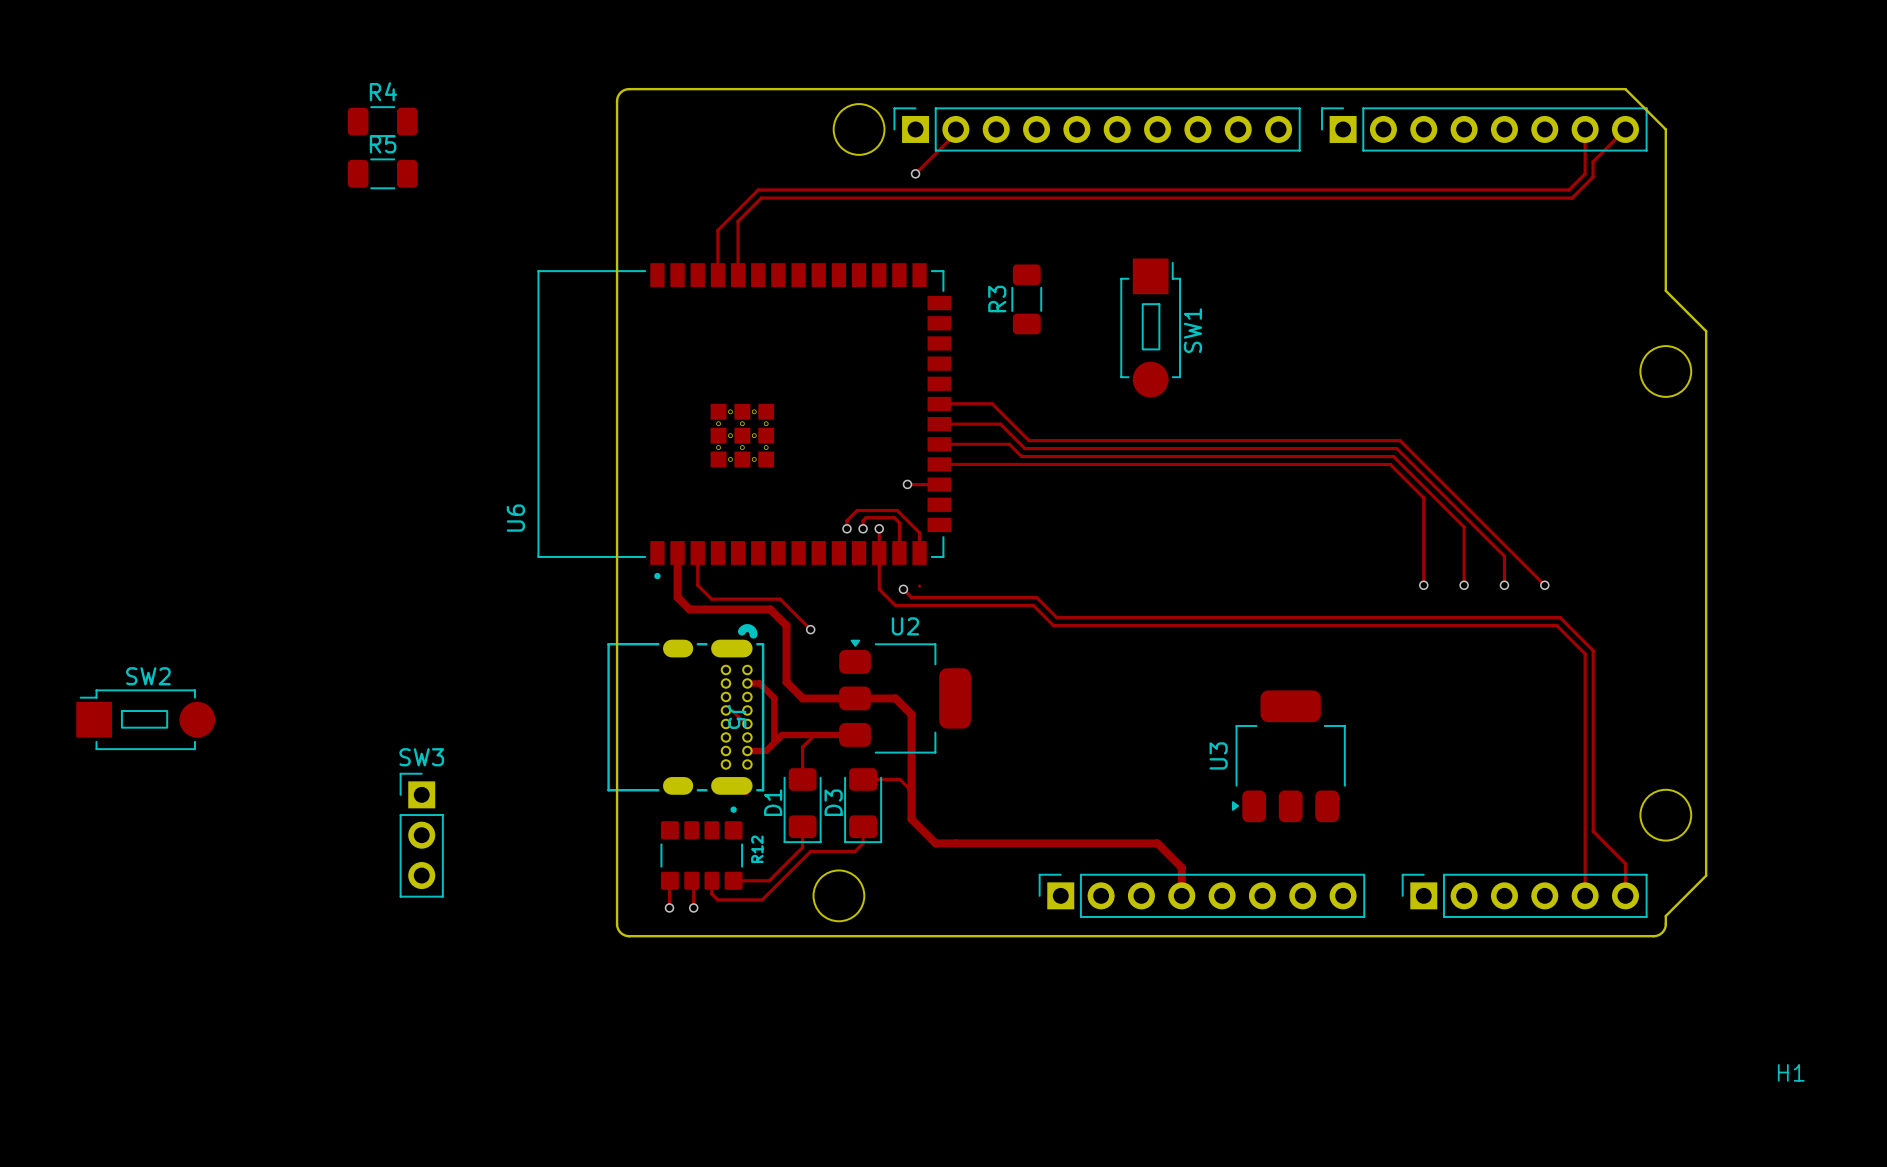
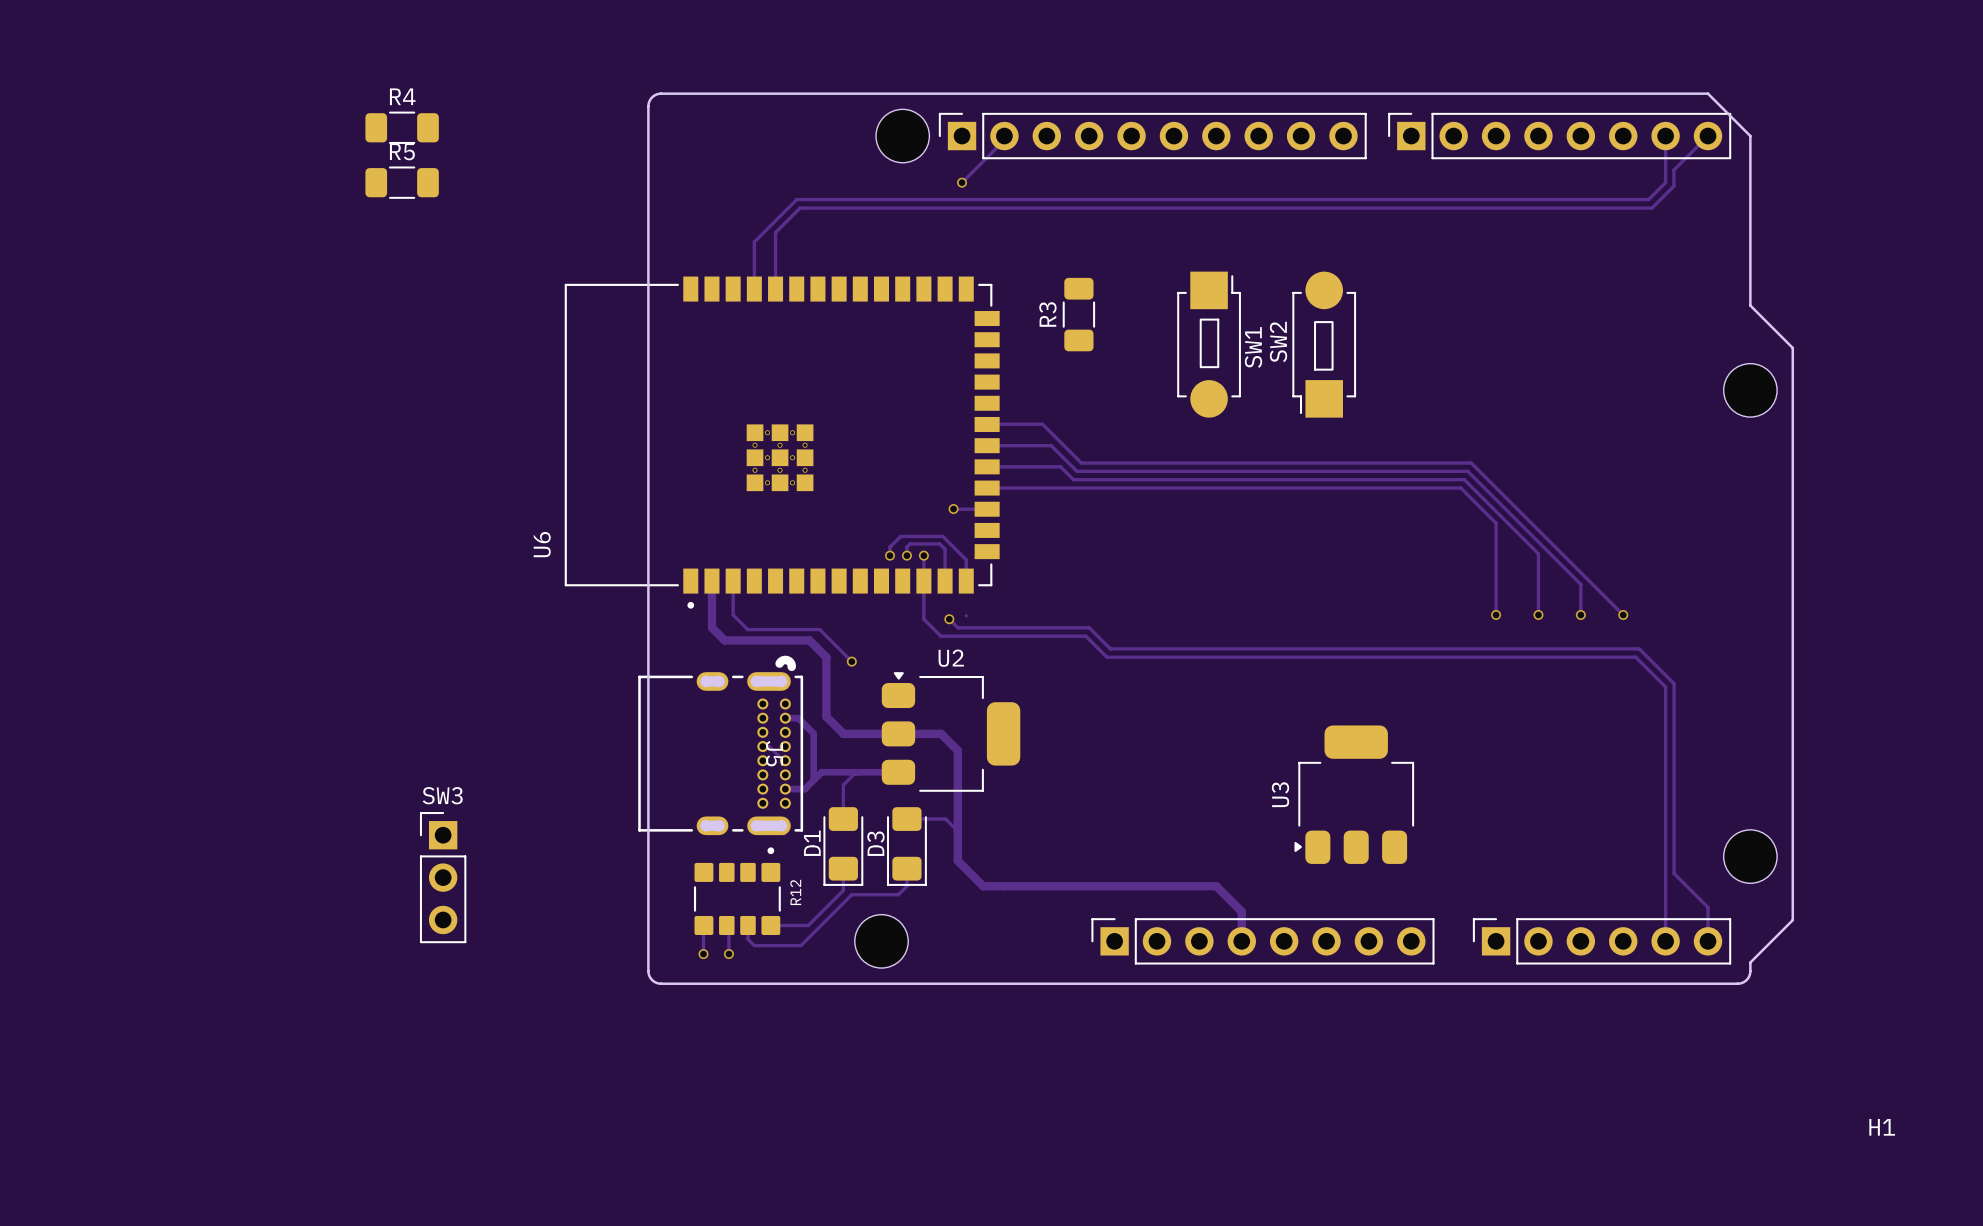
SW2 rotation: 0° (145, 719) -> 90° counterclockwise (1324, 344)
SW2 position: (145, 719) -> (1324, 344)

